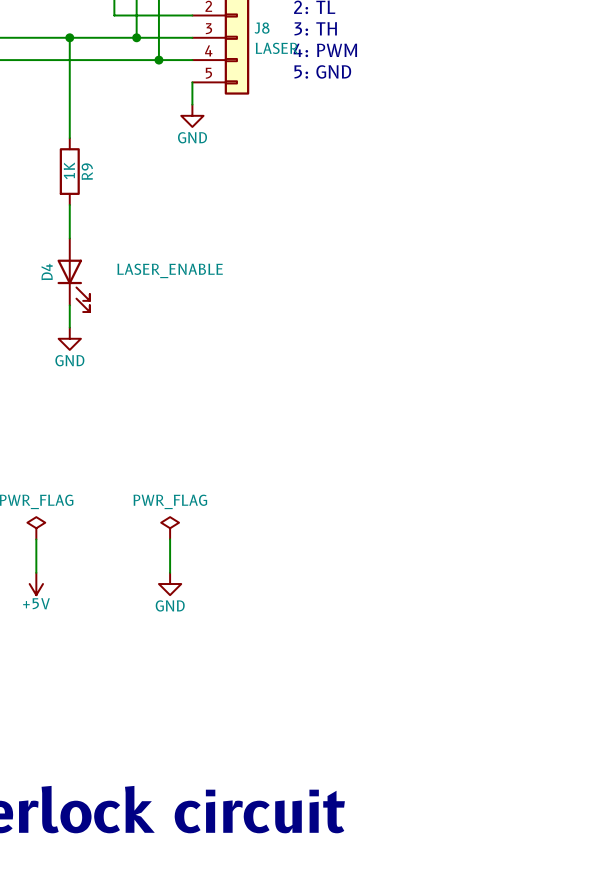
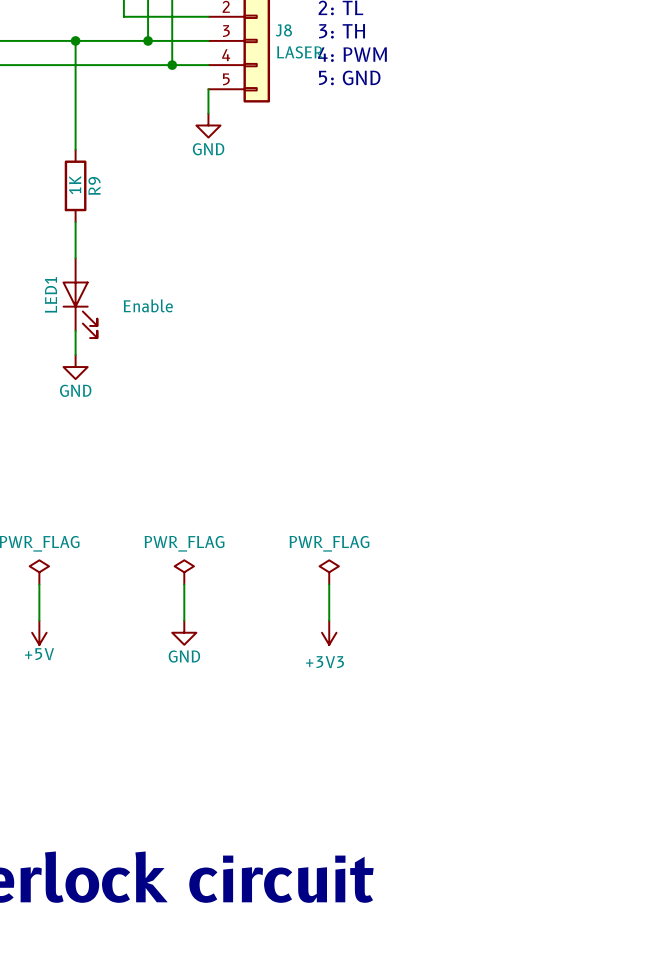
D4: LASER_ENABLE (73, 275) -> none
LED1: none -> Enable (79, 298)
power symbol: none -> PWR_FLAG (329, 572)
wire: none -> (329, 584) (329, 620)
power symbol: none -> +3V3 (329, 632)

